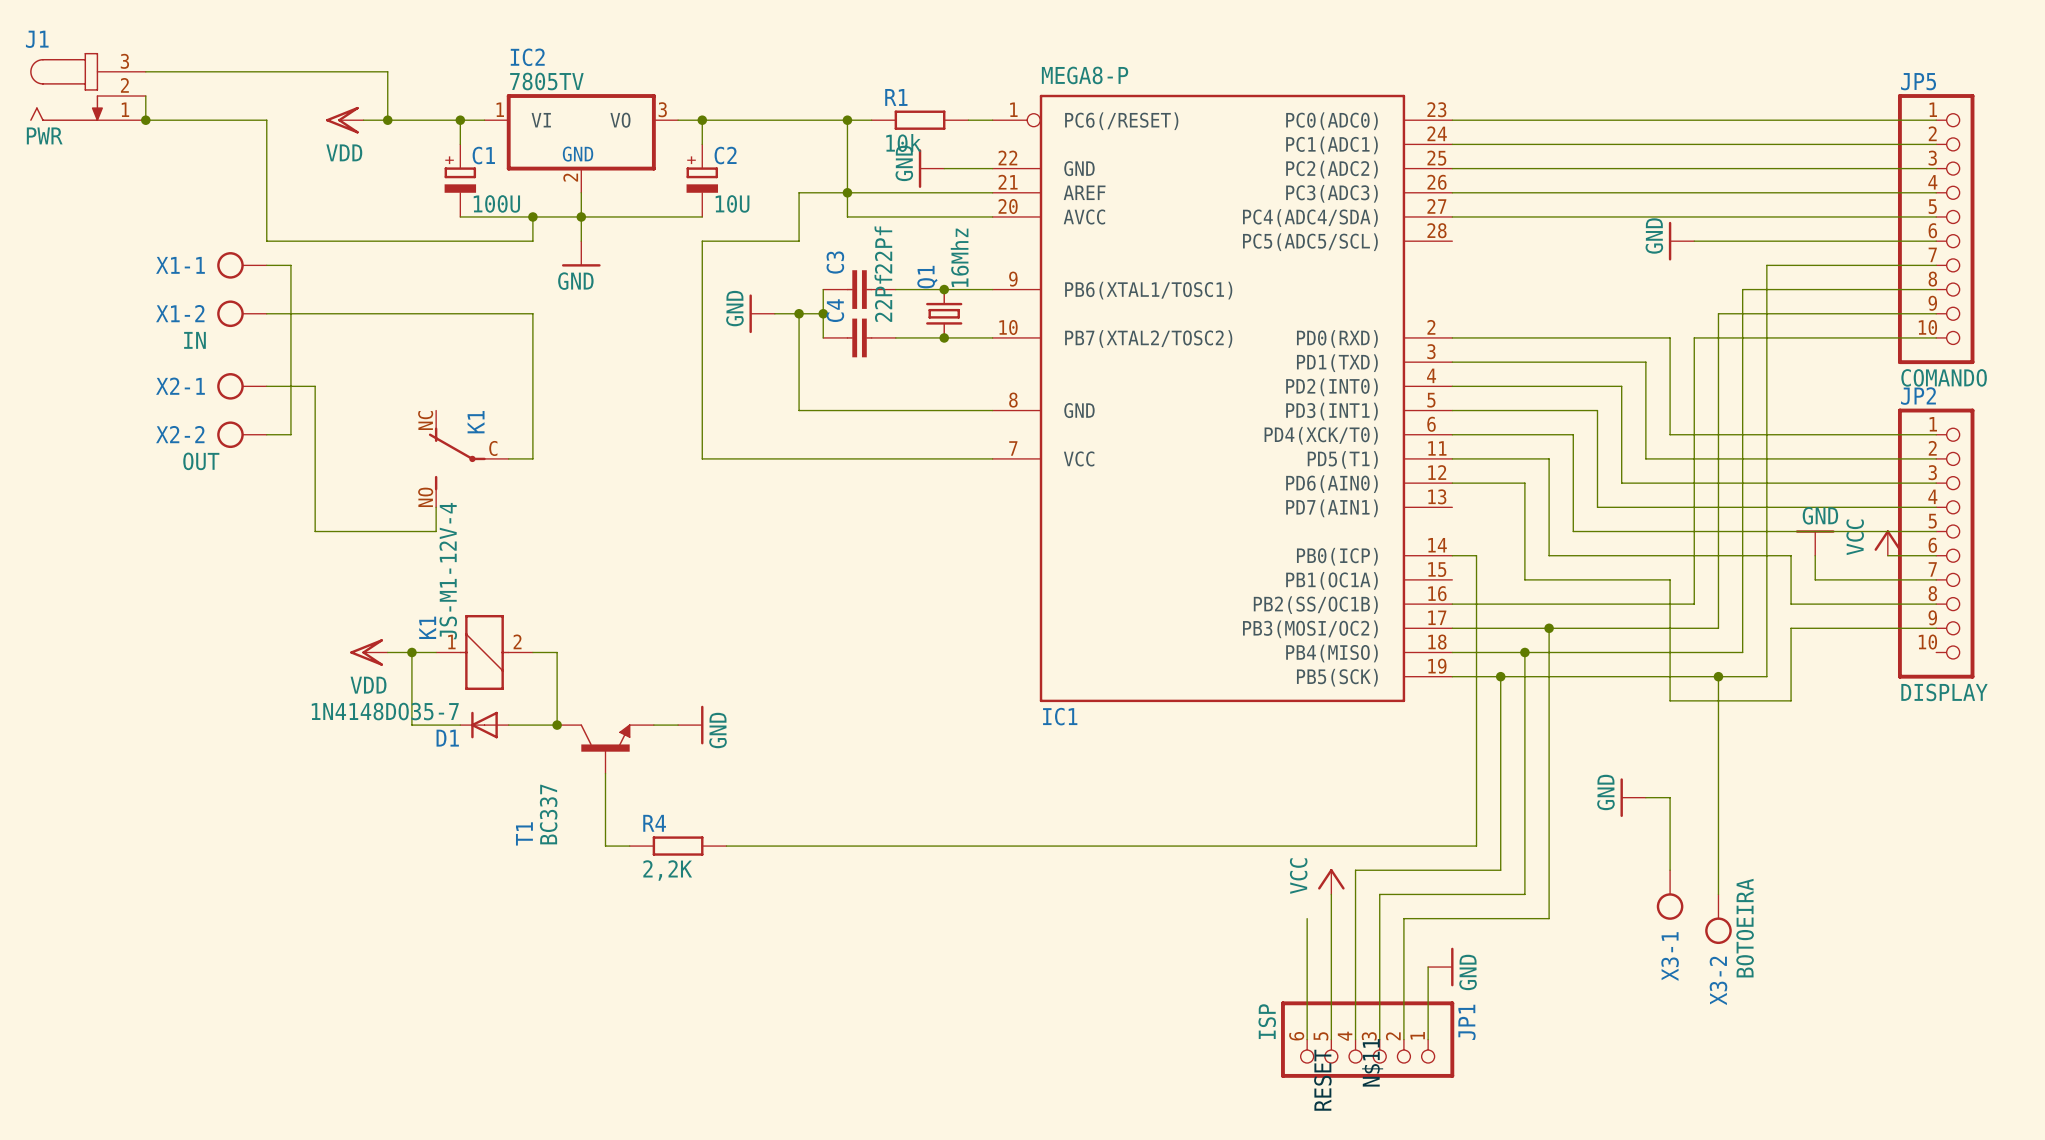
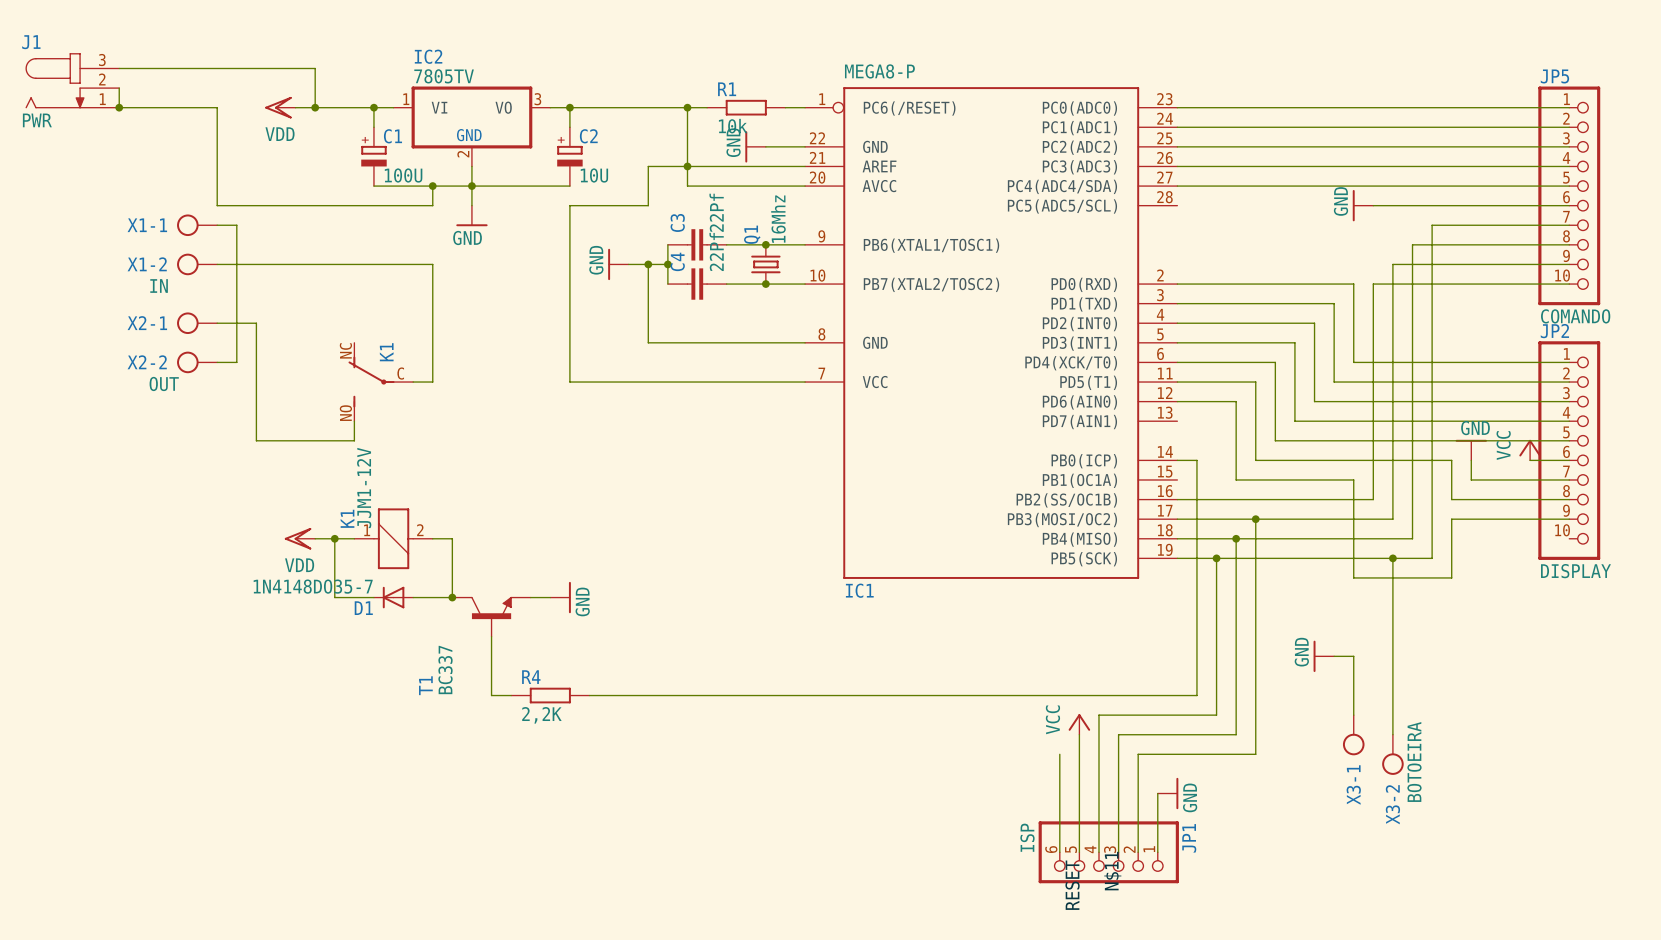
K1 value: JS-M1-12V-4 (448, 571) -> JJM1-12V (364, 487)

